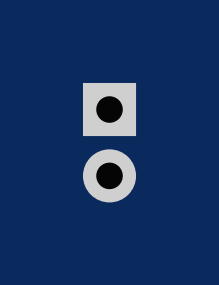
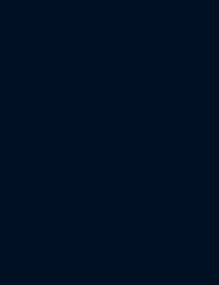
part: (109, 142) -> none

